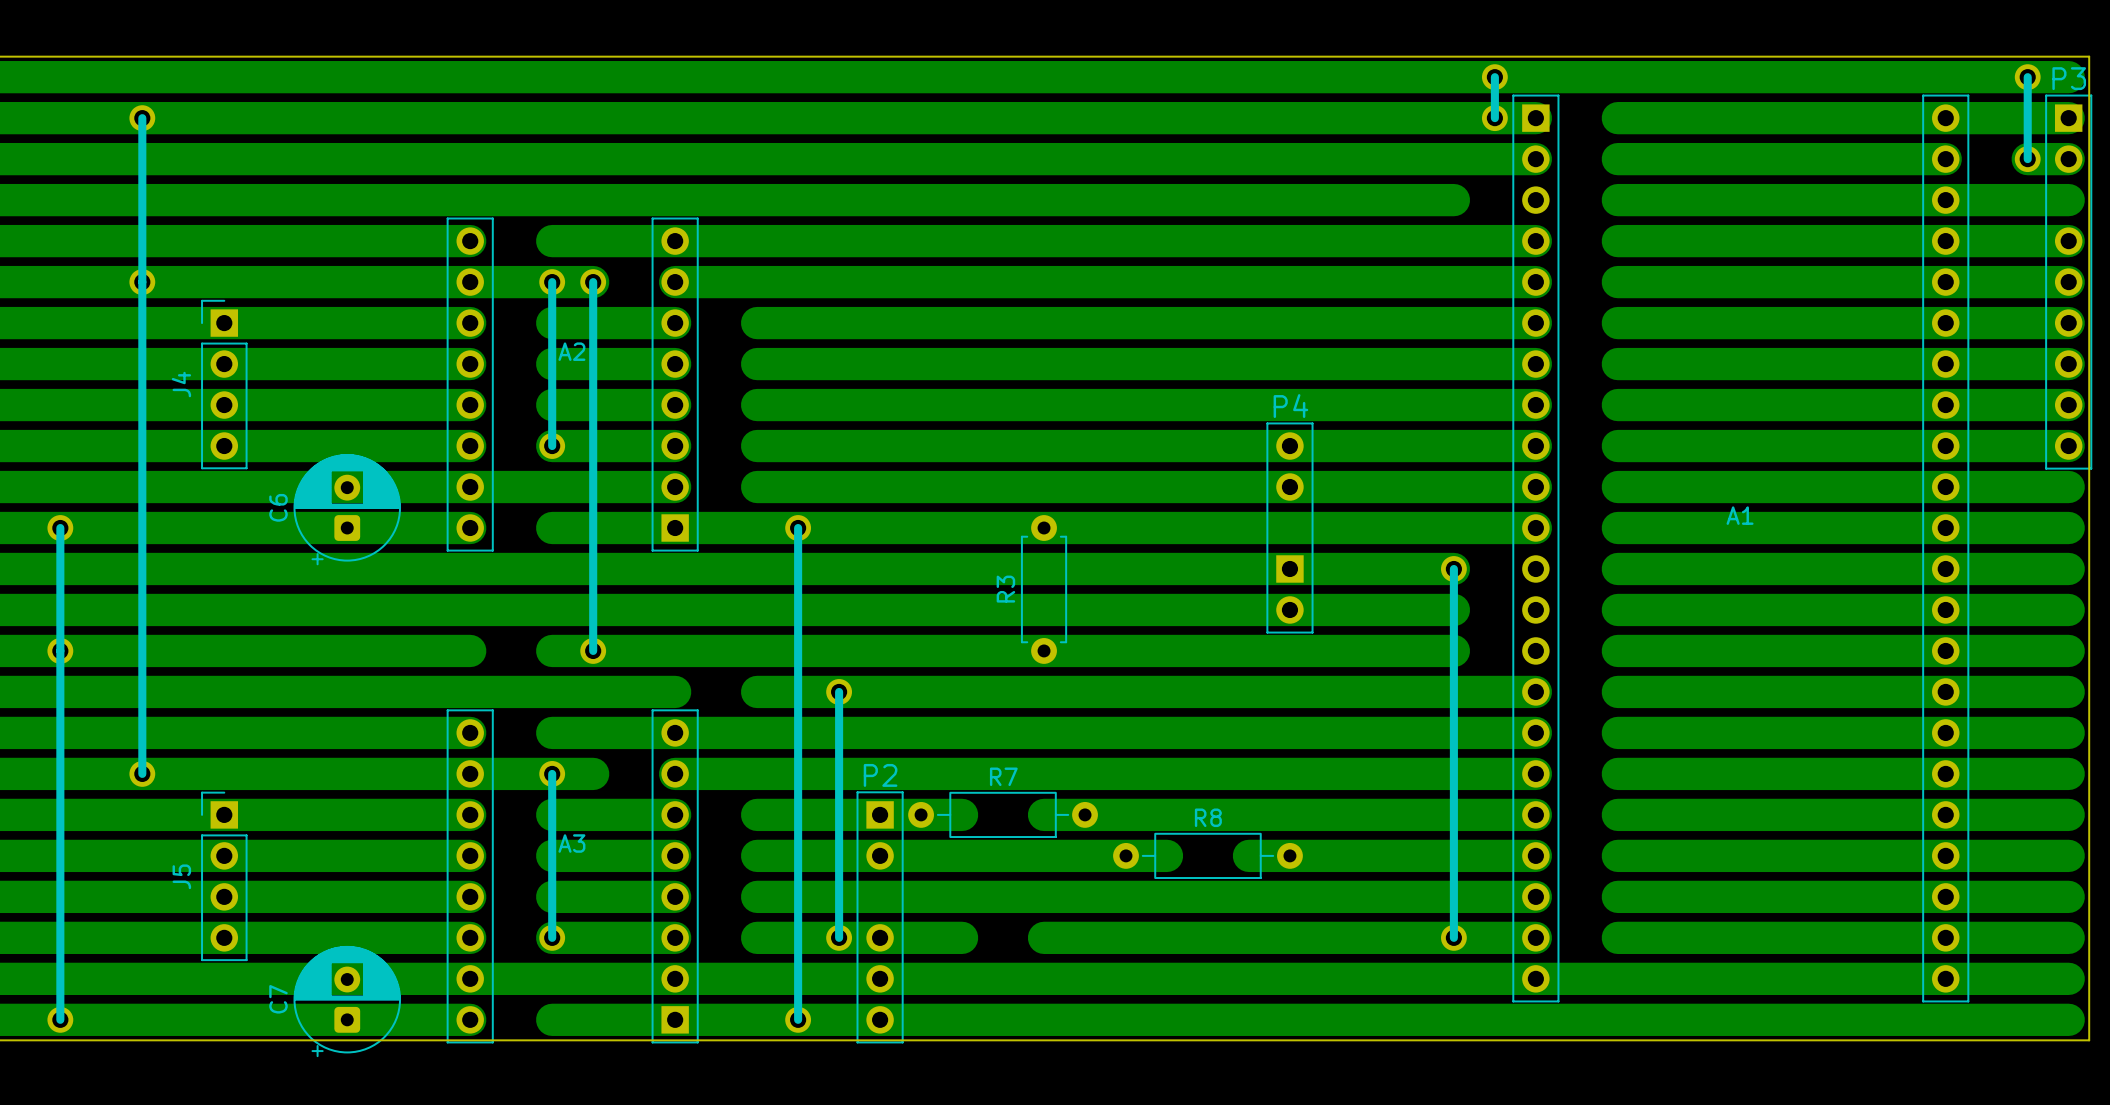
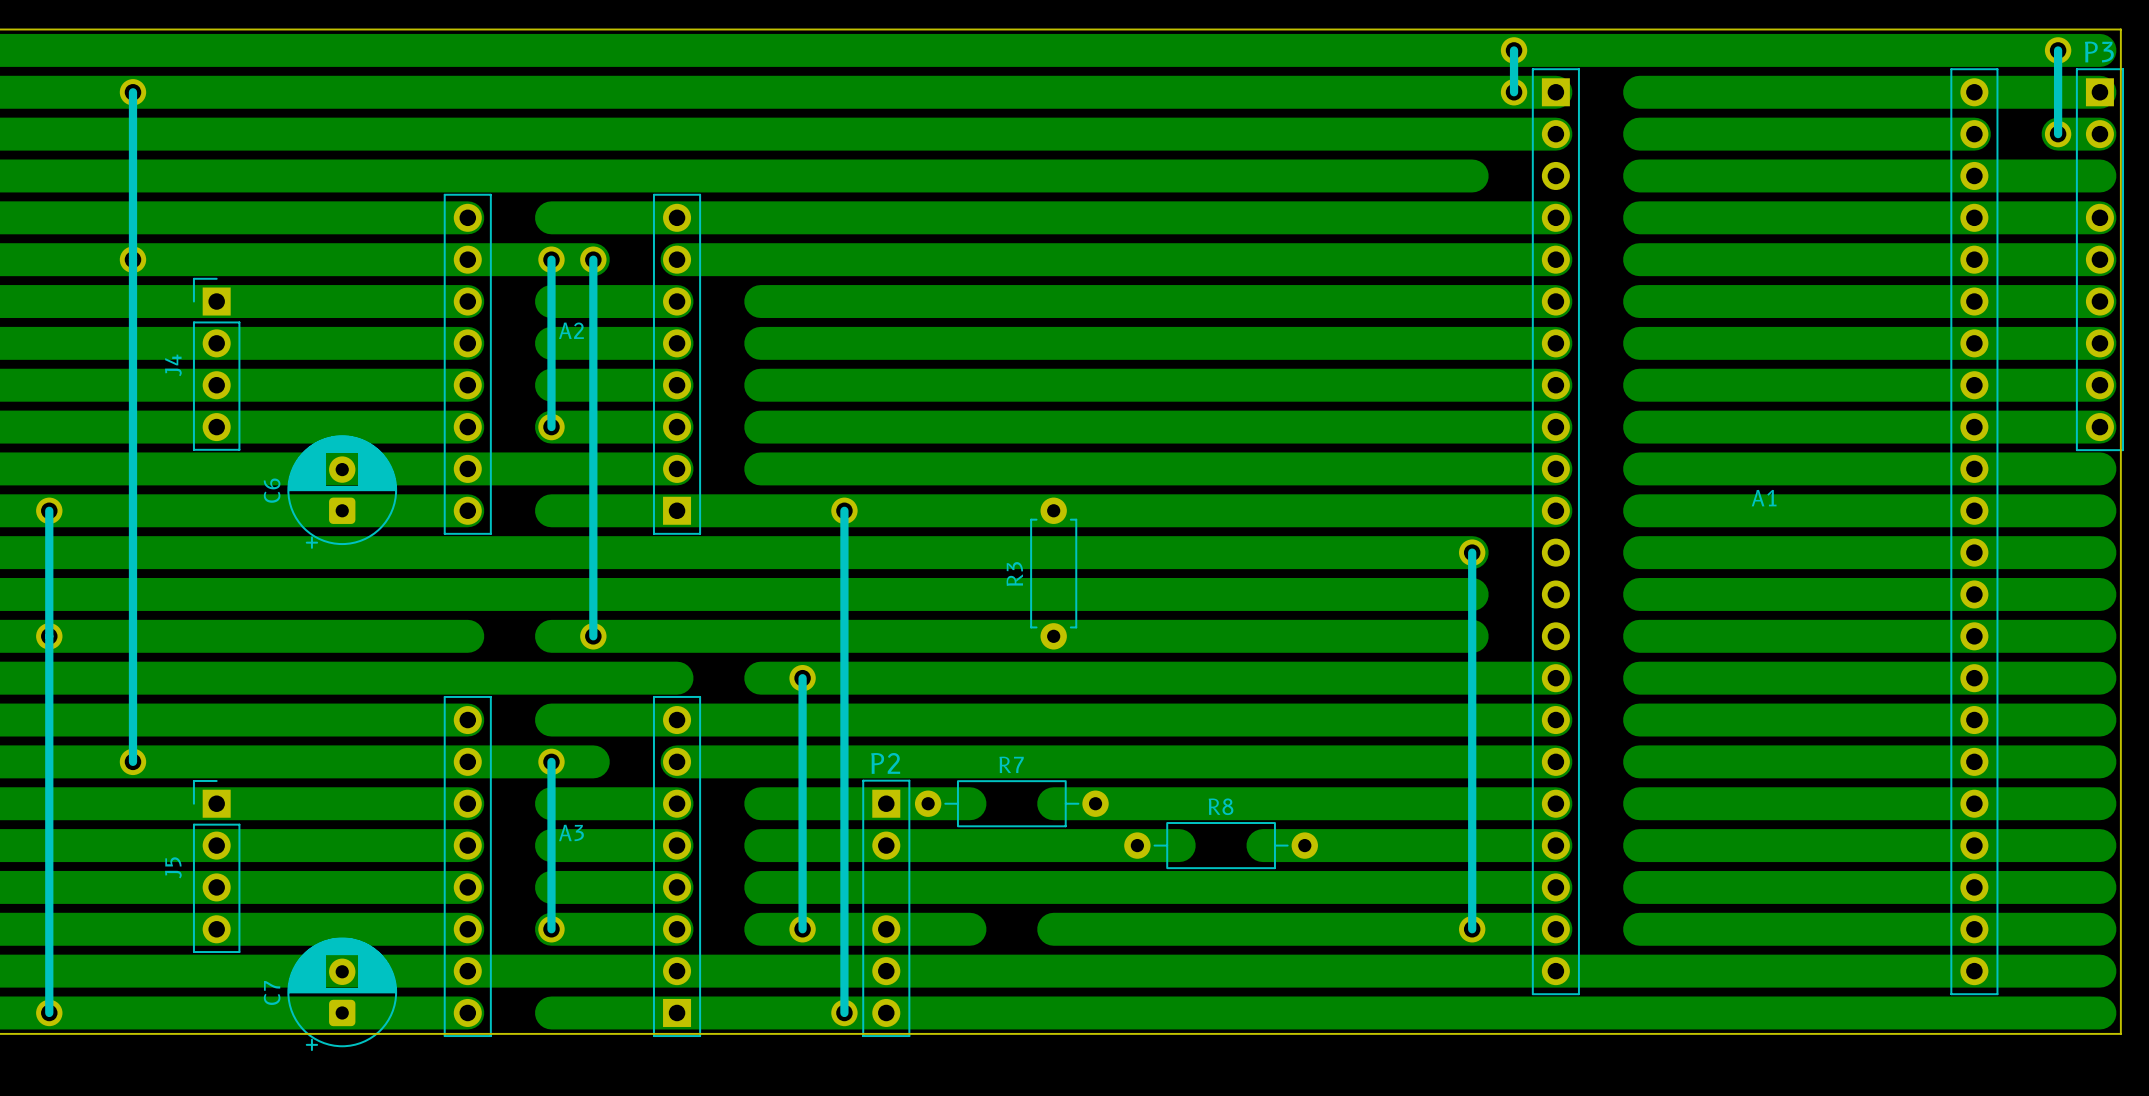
P4: (1289, 528) -> none
part position: (798, 773) -> (844, 761)
part position: (839, 814) -> (802, 803)

